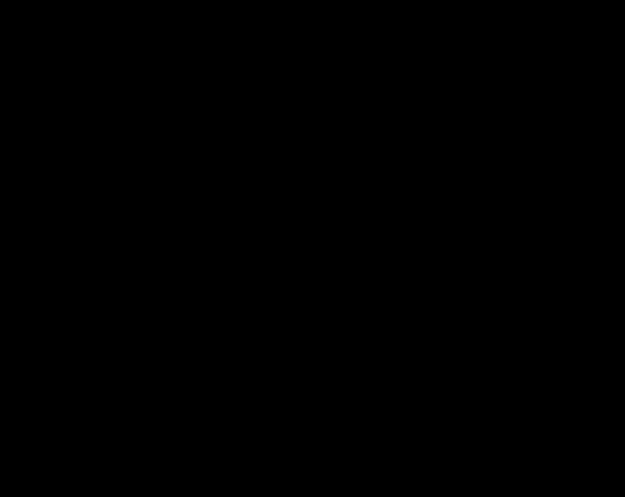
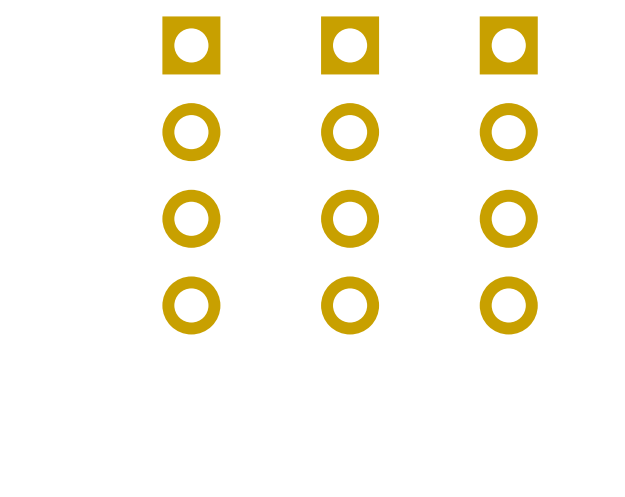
part: none -> (191, 175)
part: none -> (350, 175)
part: none -> (508, 175)

